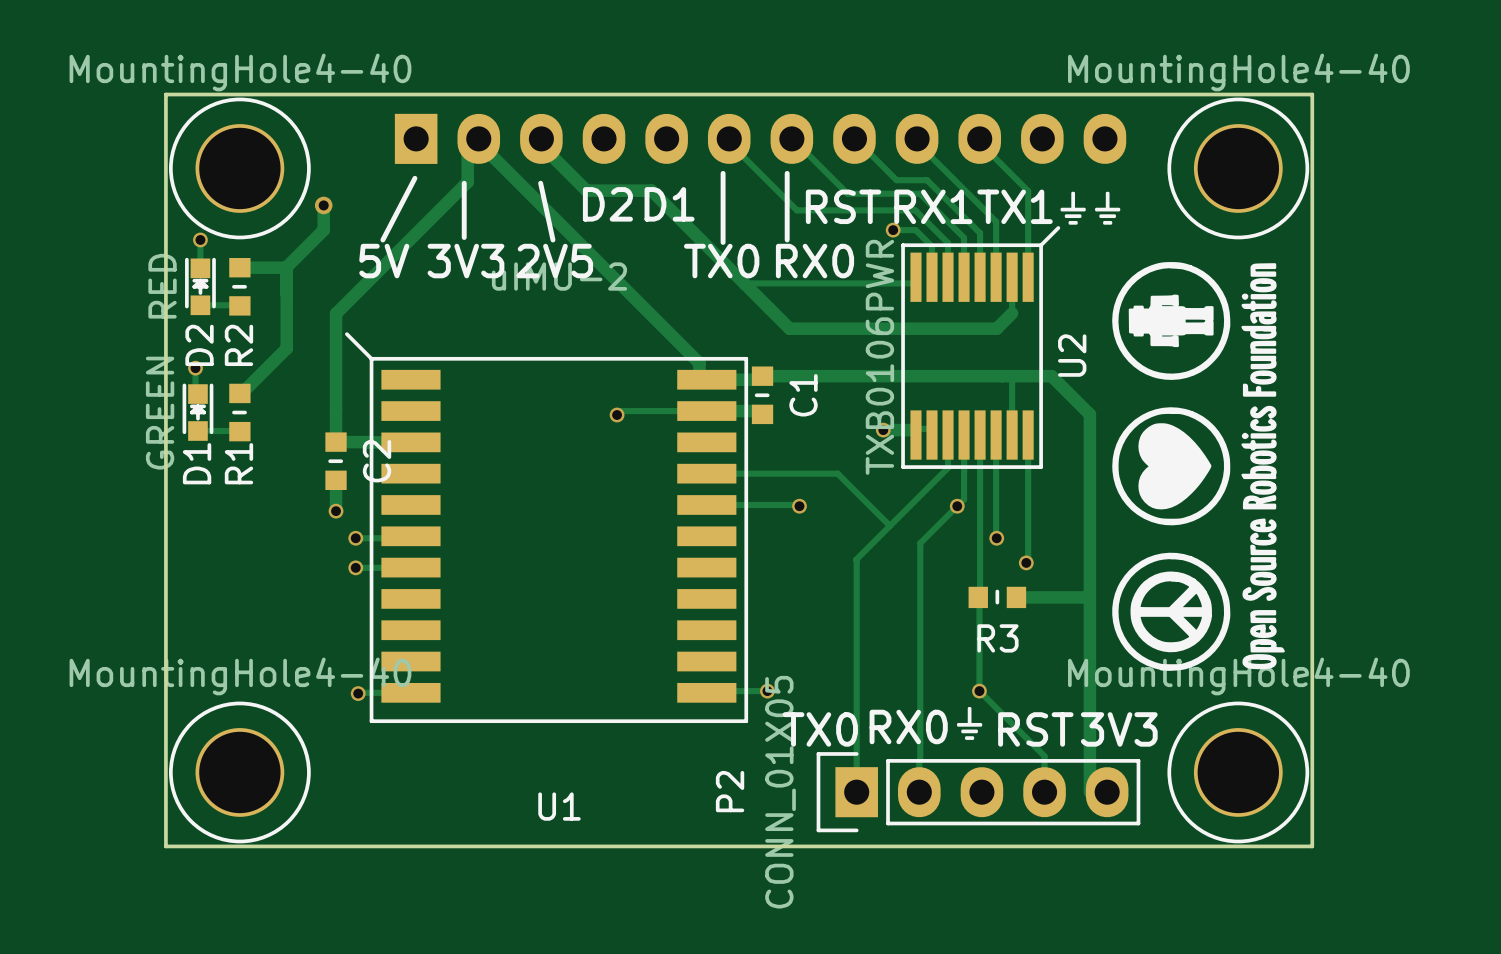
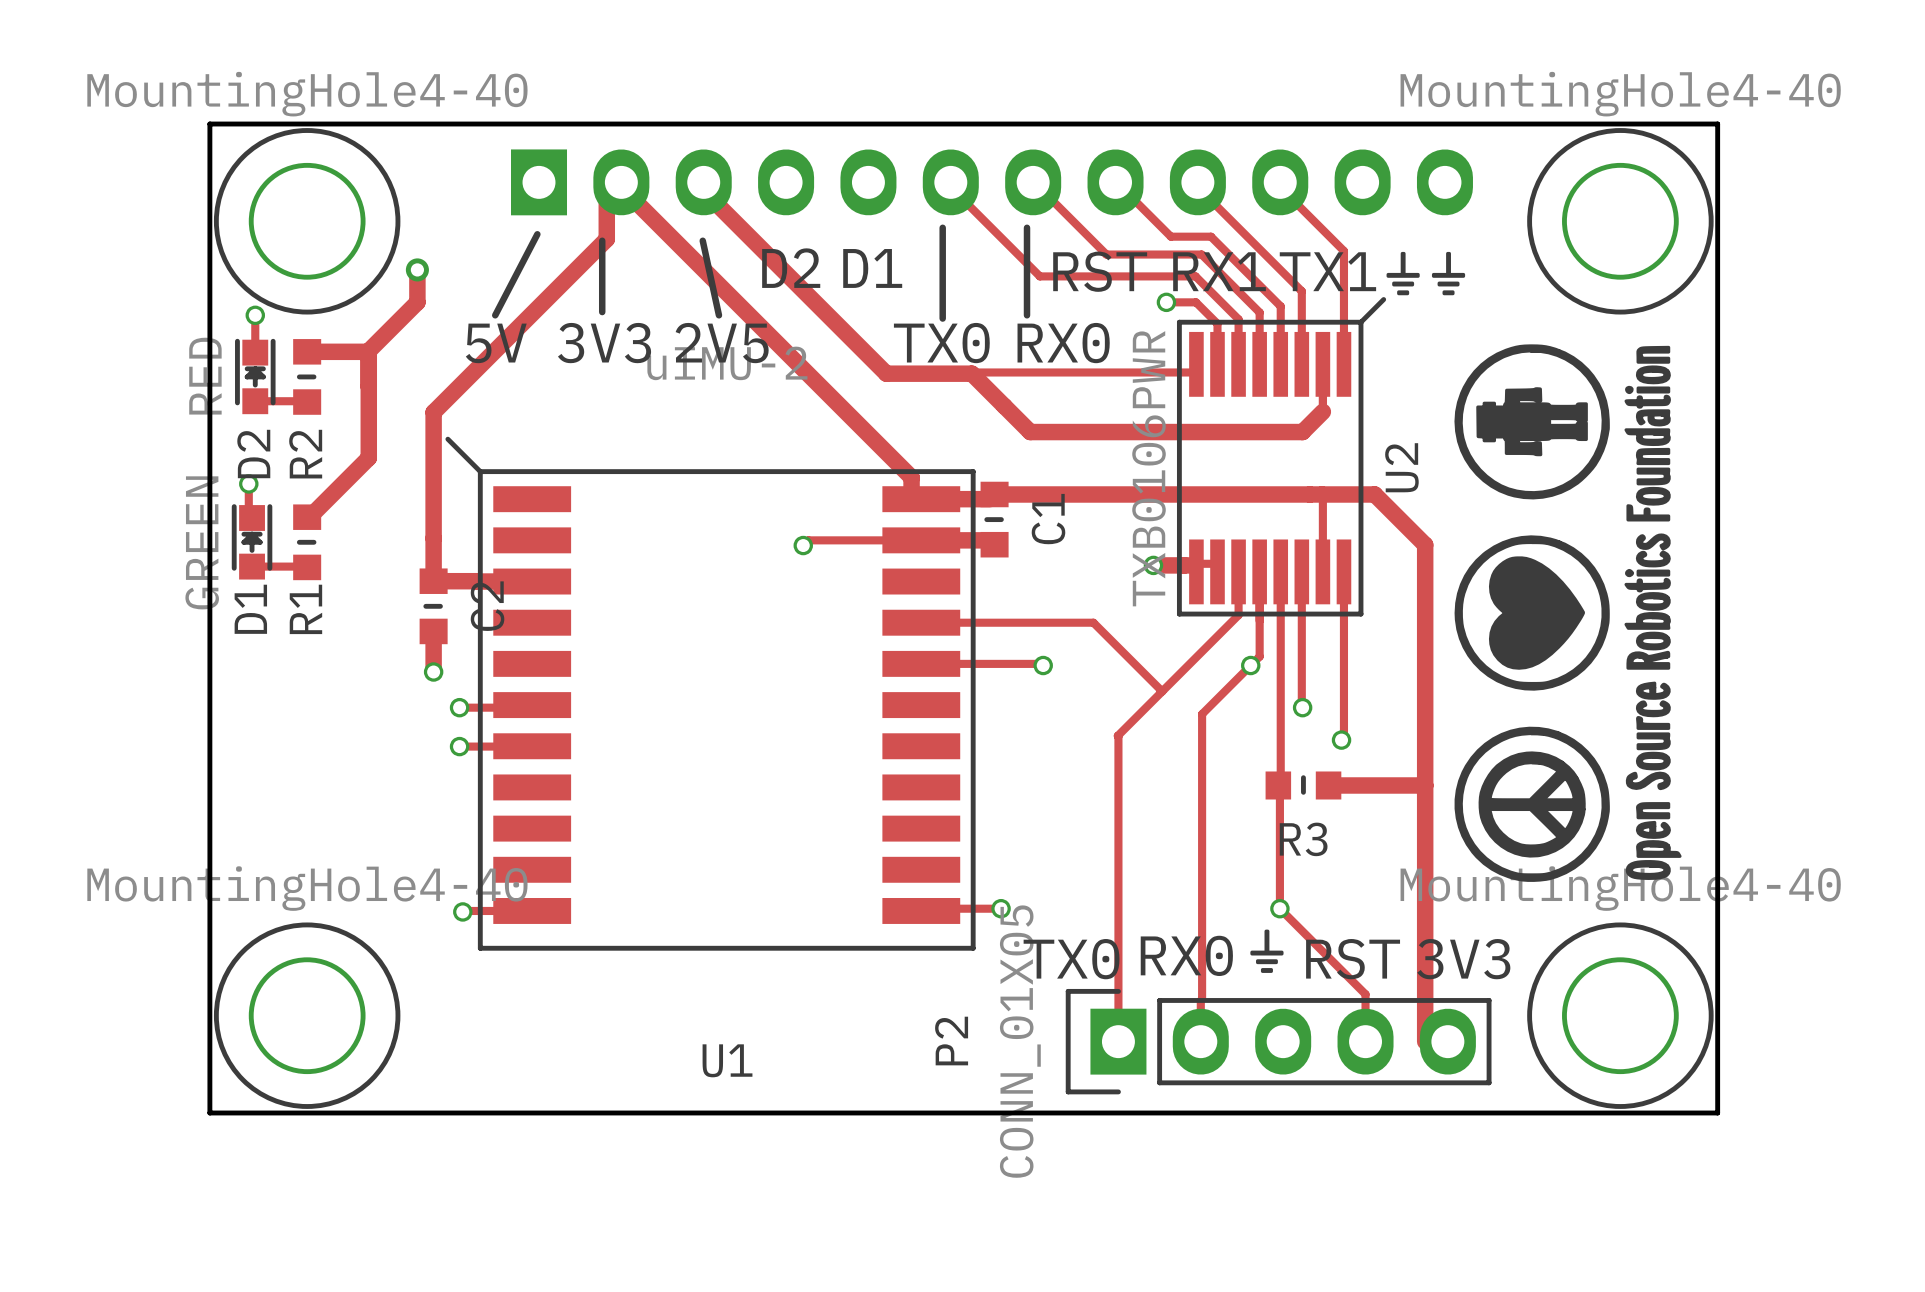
track: (586, 190) (651, 190) (745, 284) -> (763, 250) (886, 373) (971, 373)

